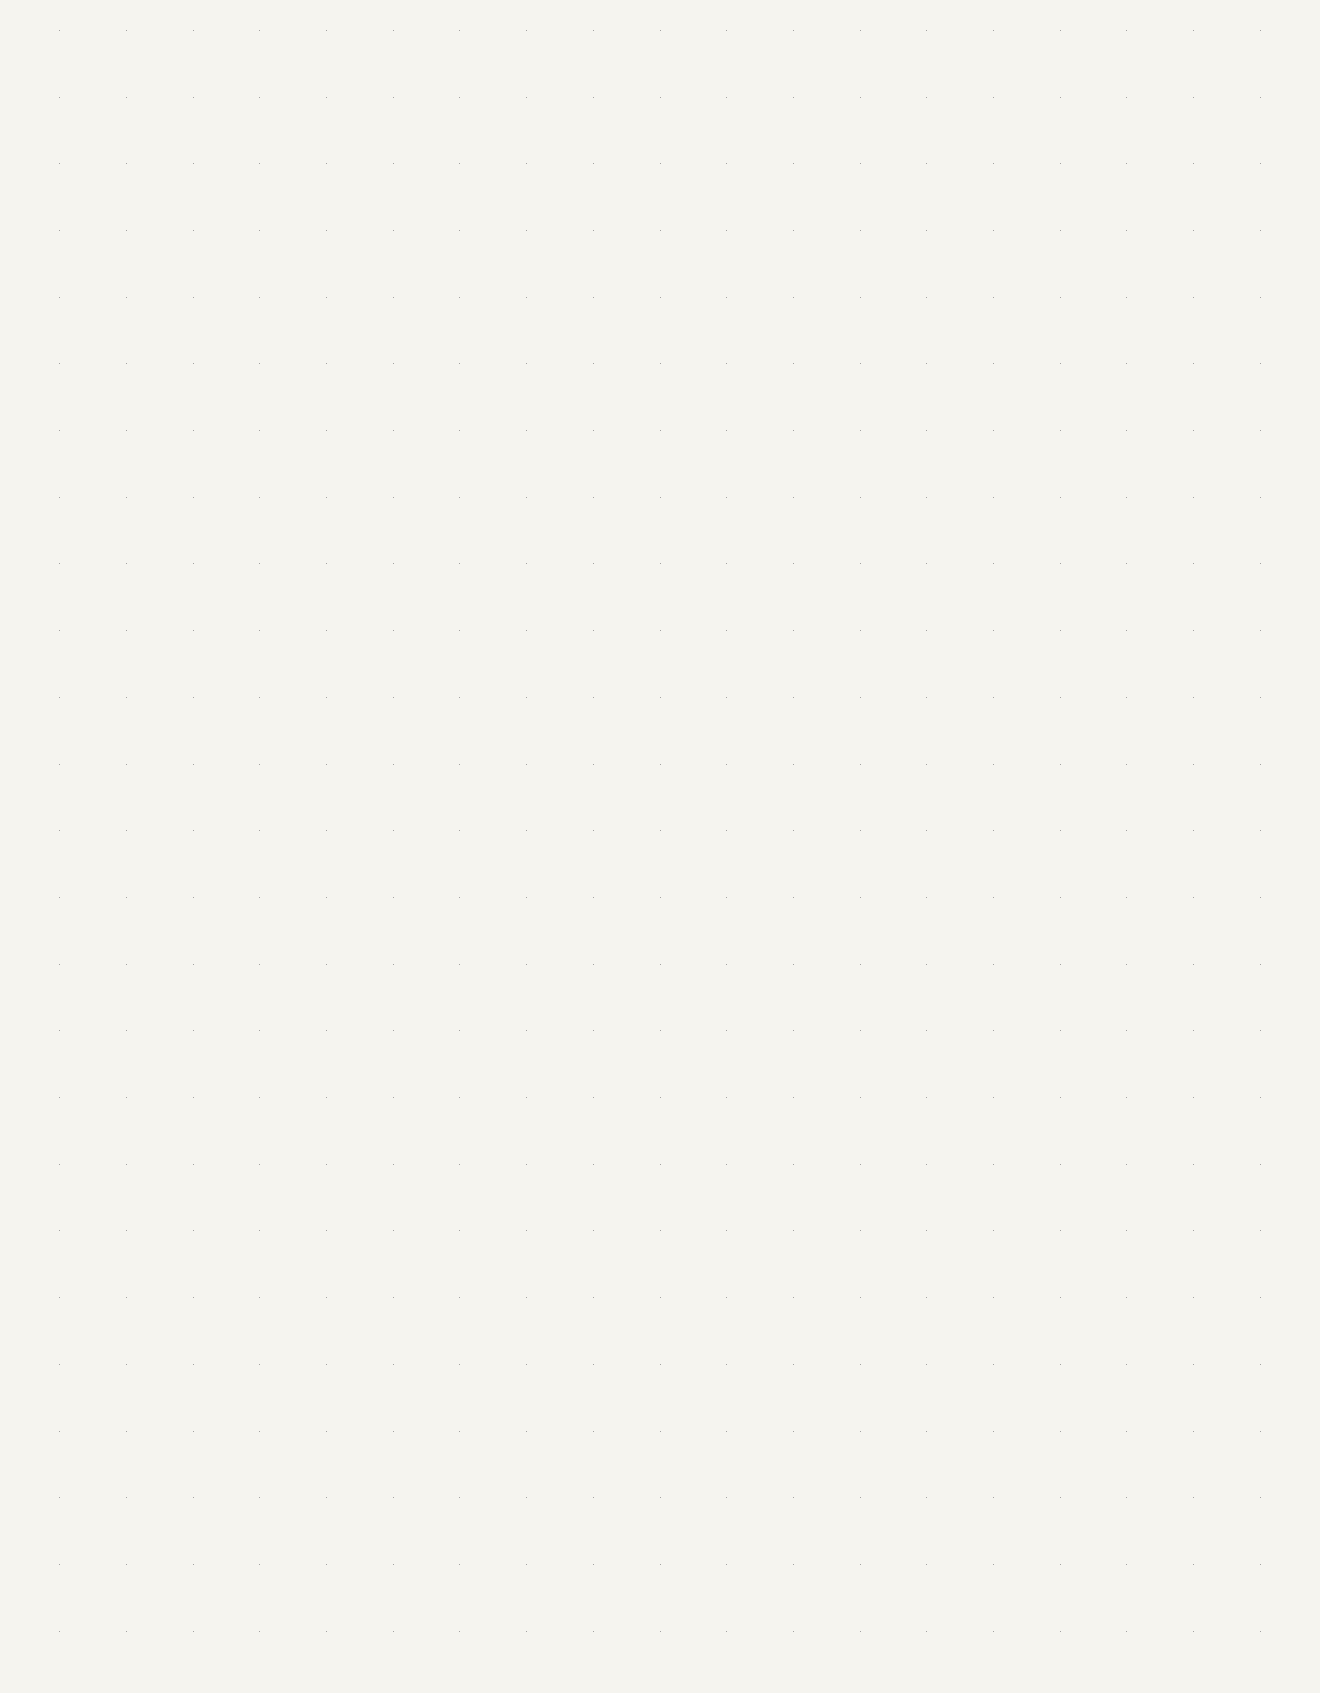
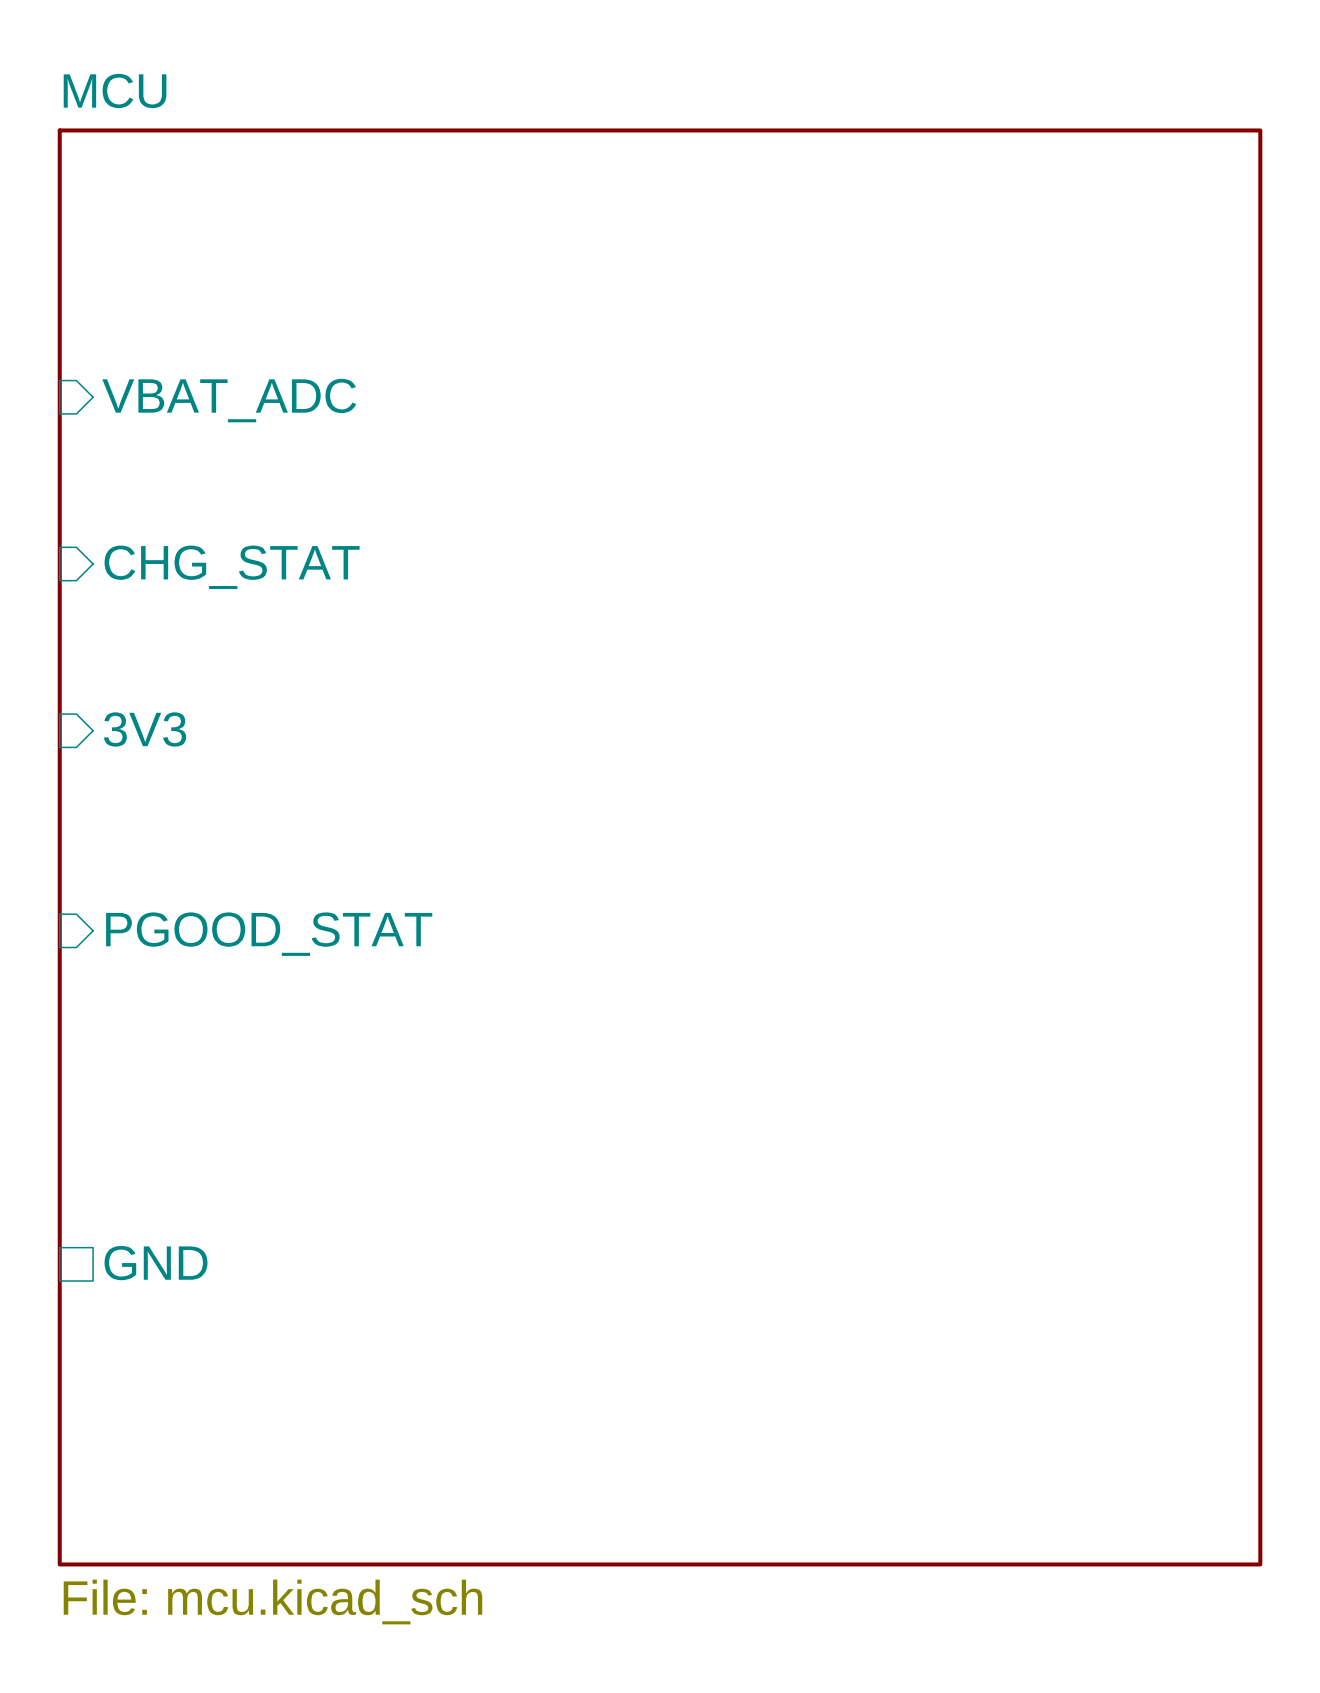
sheet pin: none -> VBAT_ADC (229, 400)
sheet pin: none -> CHG_STAT (232, 567)
sheet pin: none -> 3V3 (145, 729)
sheet MCU: none -> File: mcu.kicad_sch (660, 847)
sheet pin: none -> PGOOD_STAT (269, 934)
sheet pin: none -> GND (156, 1263)

